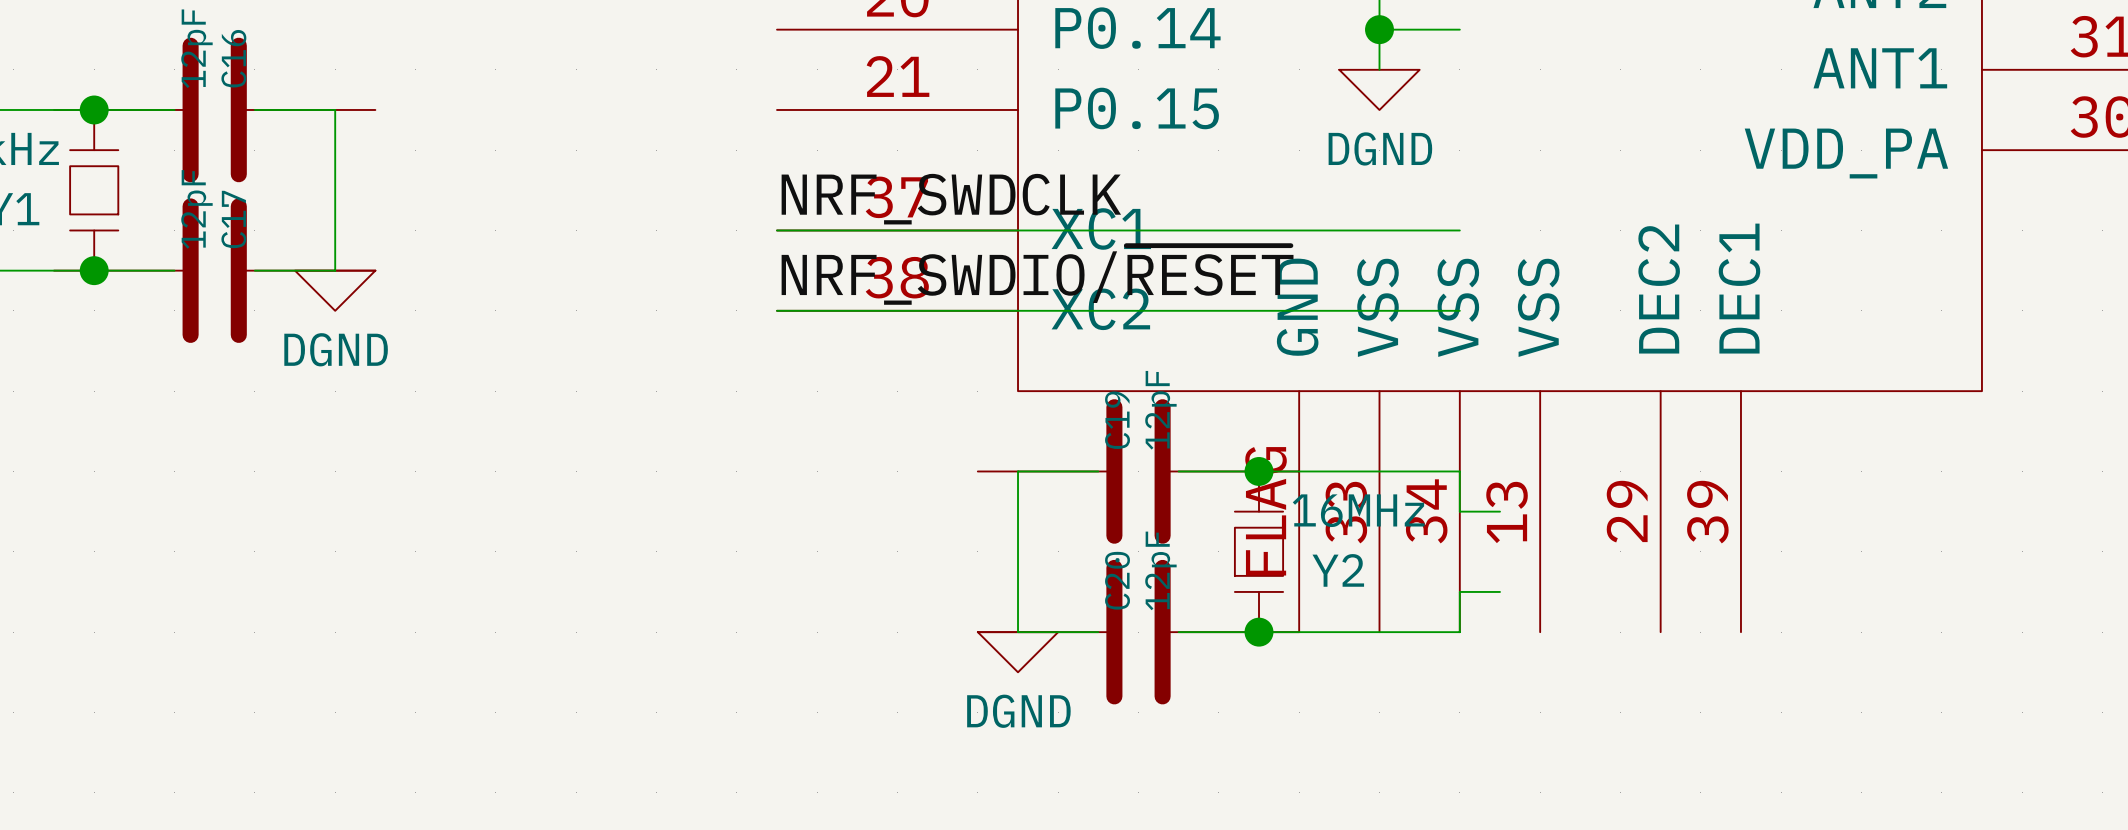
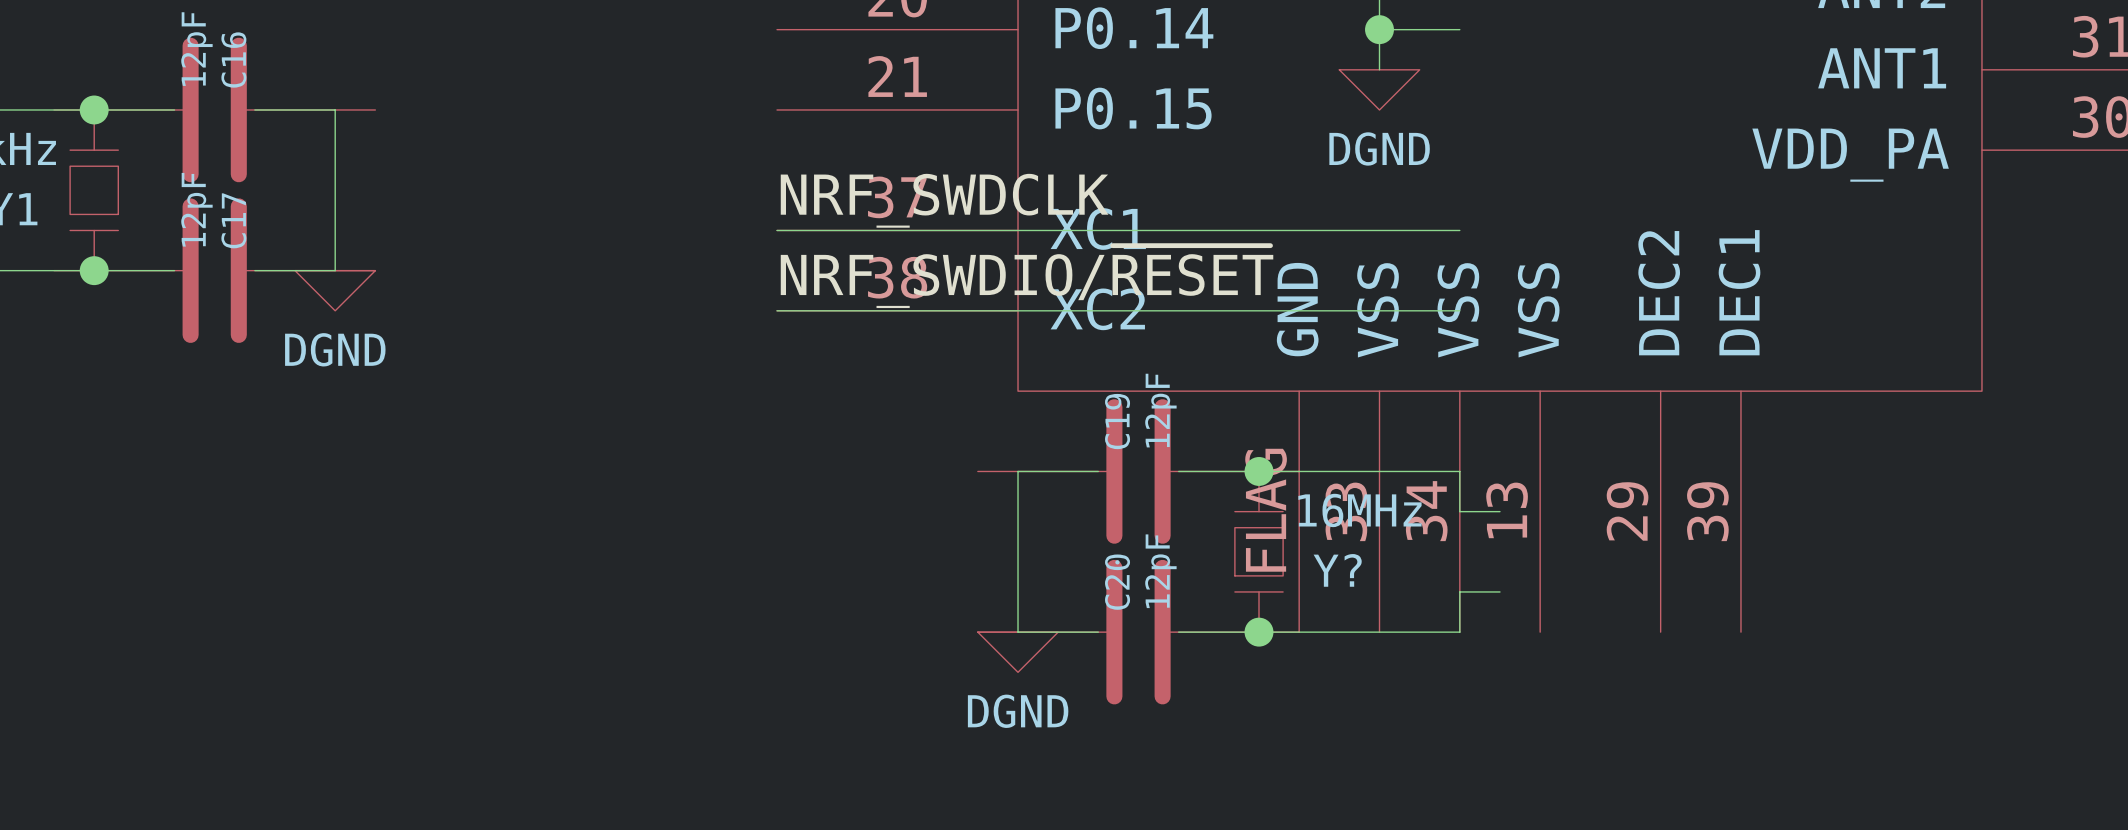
Y2 name: Y2 (1338, 570) -> Y? (1337, 570)

